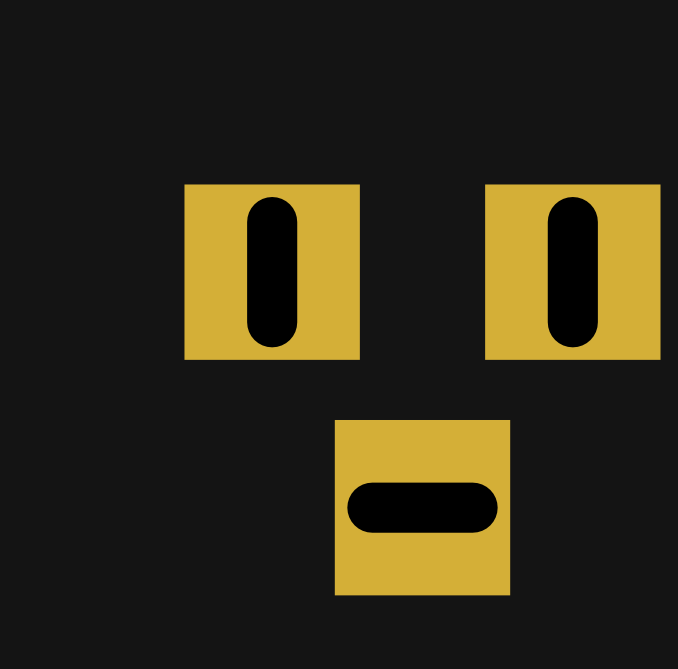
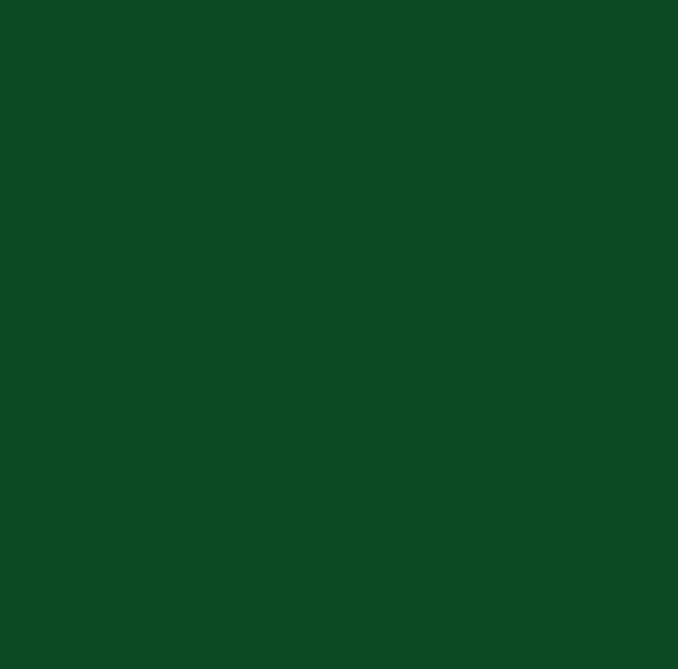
part: (422, 389) -> none

